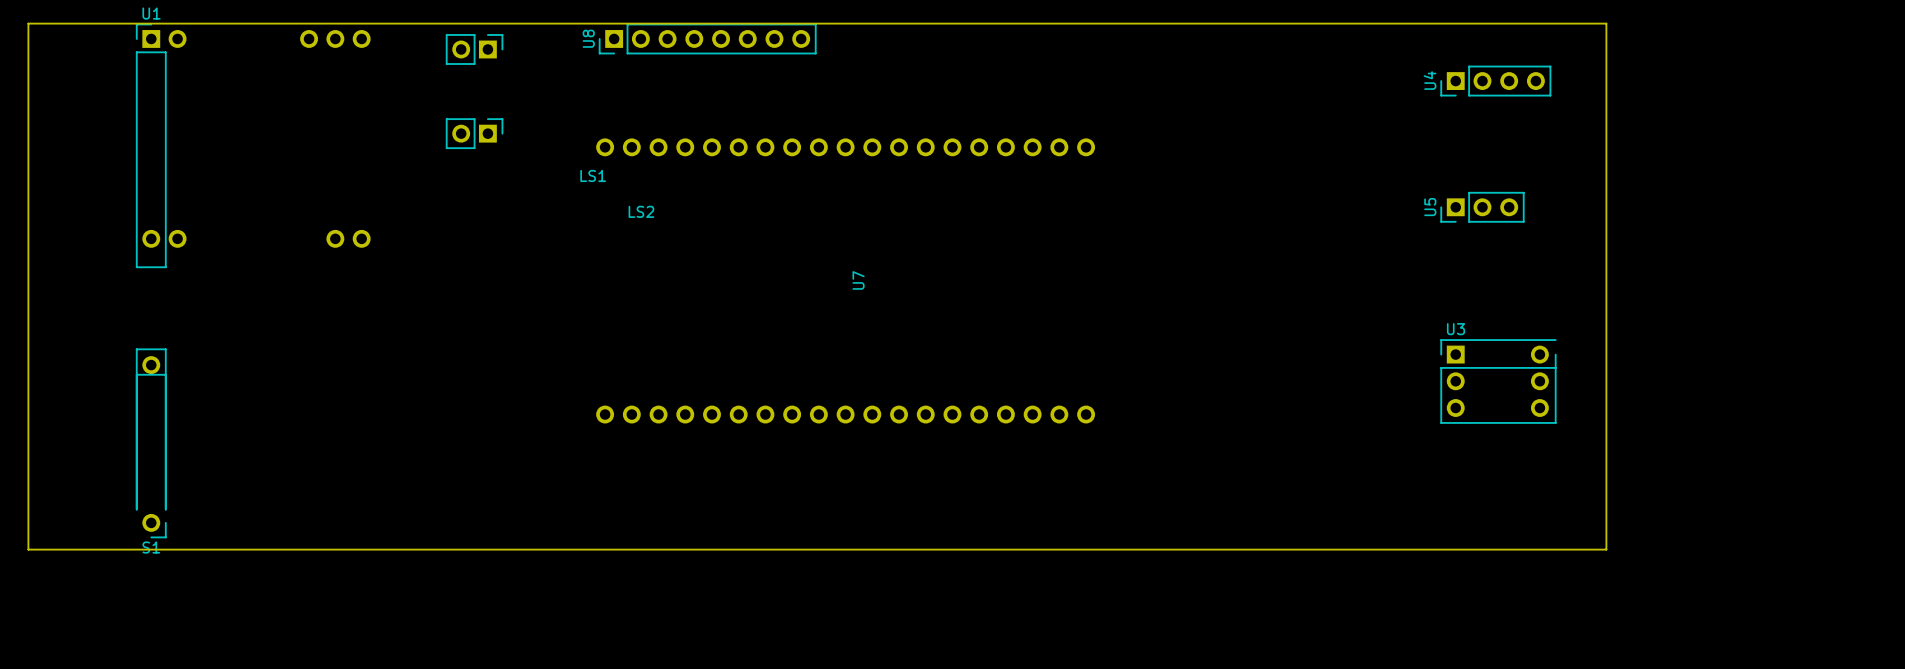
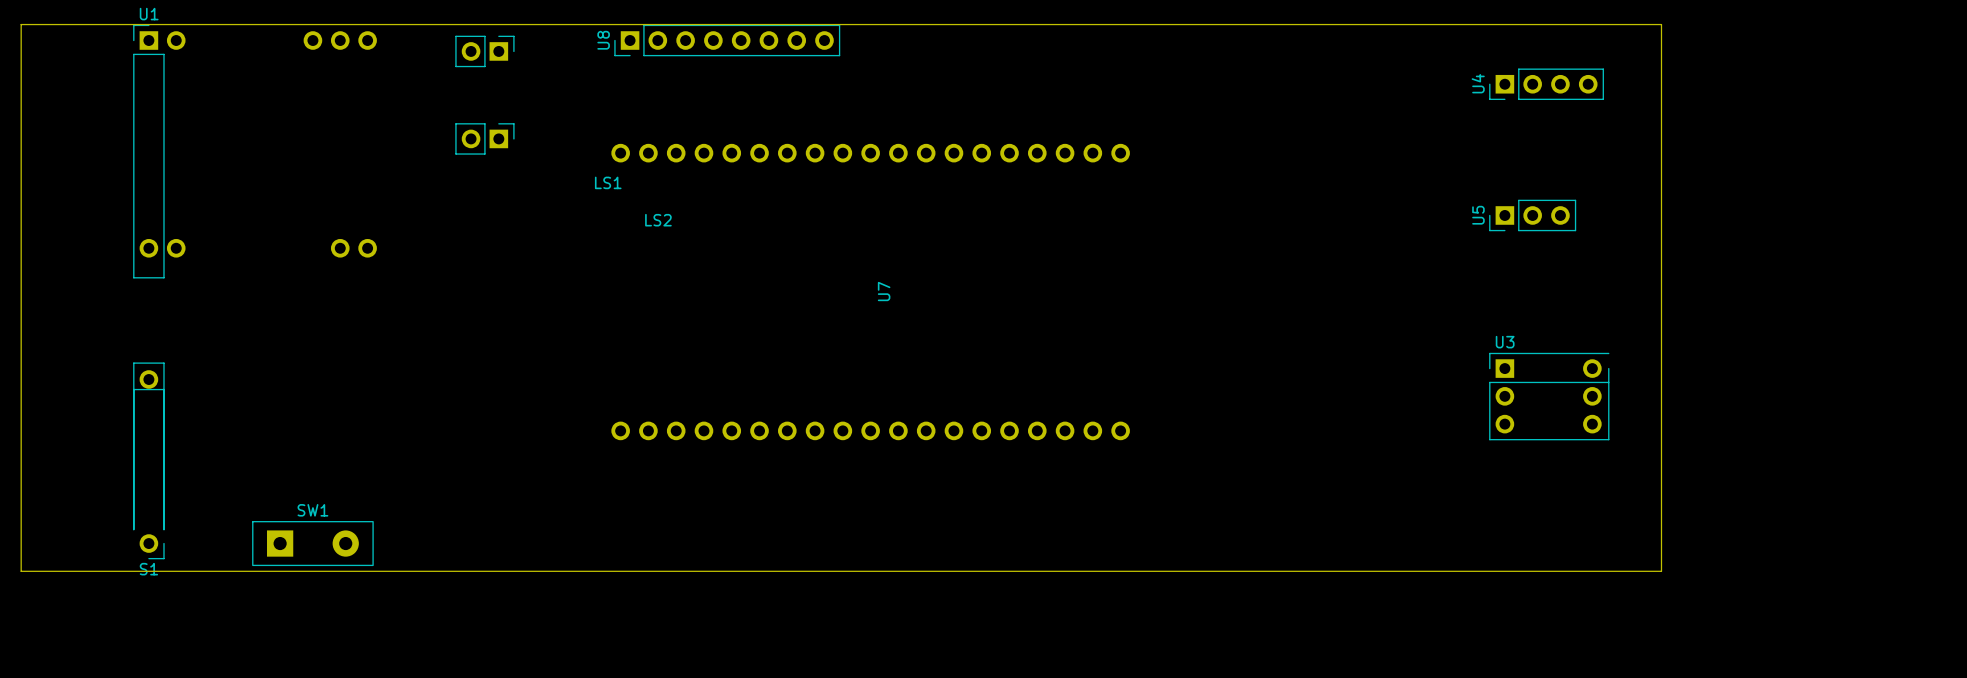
SW1: none -> (312, 543)

